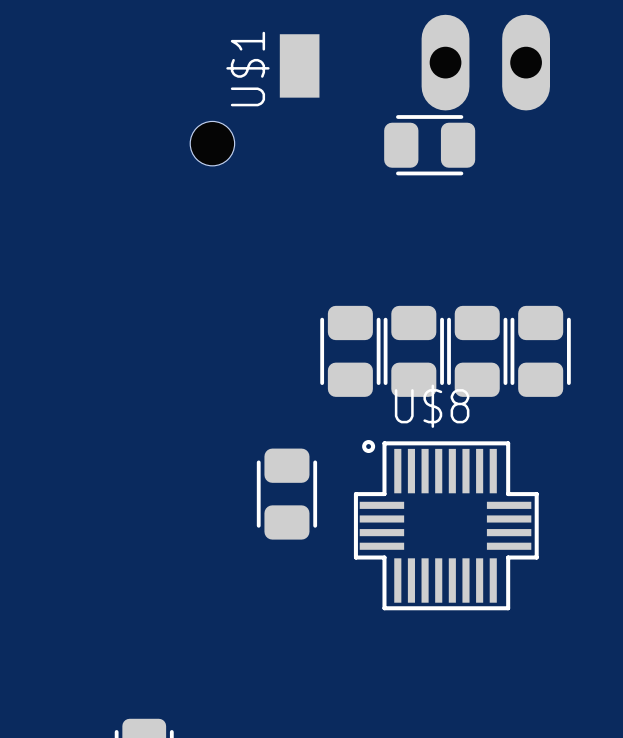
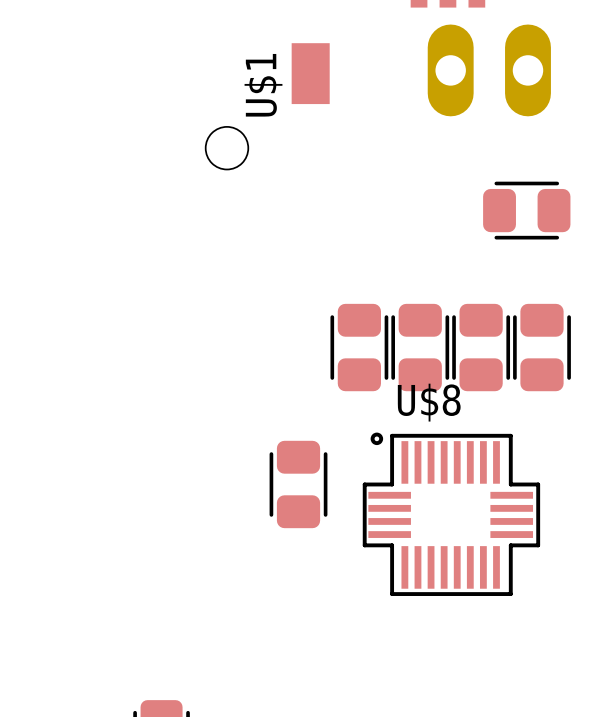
part position: (429, 145) -> (526, 210)

